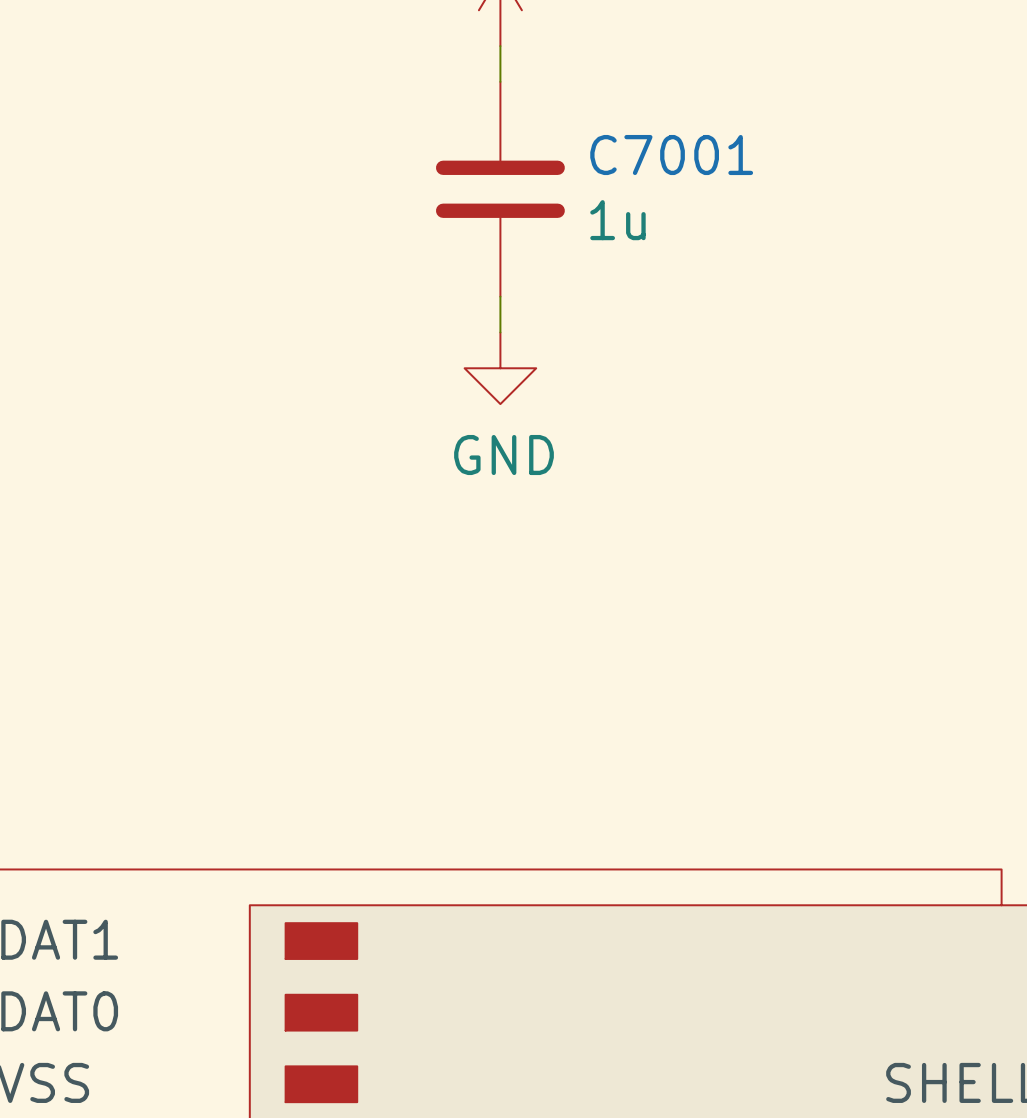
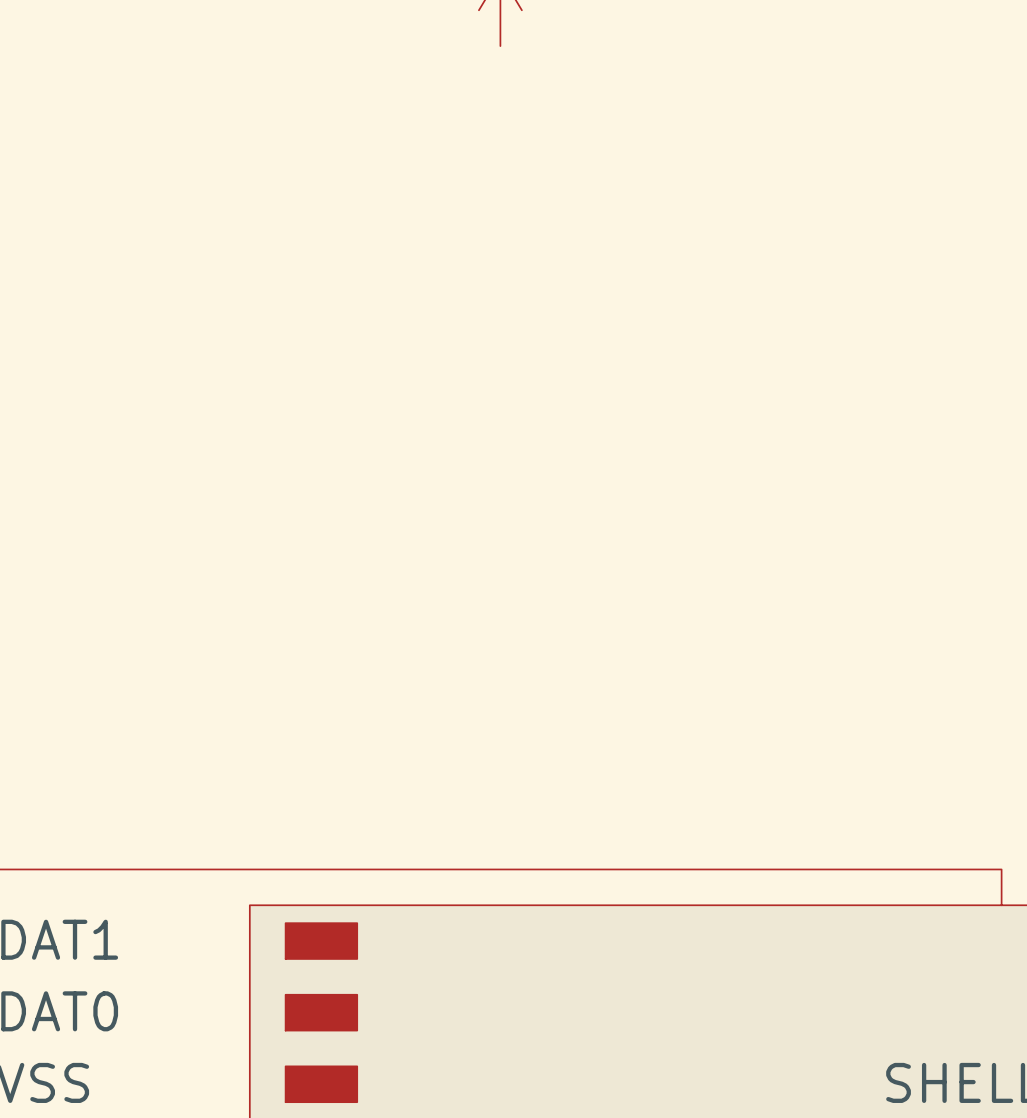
wire: (500, 46) (500, 81) -> none
C7001: 1u (500, 189) -> none
wire: (500, 296) (500, 332) -> none
power symbol: GND (500, 368) -> none

